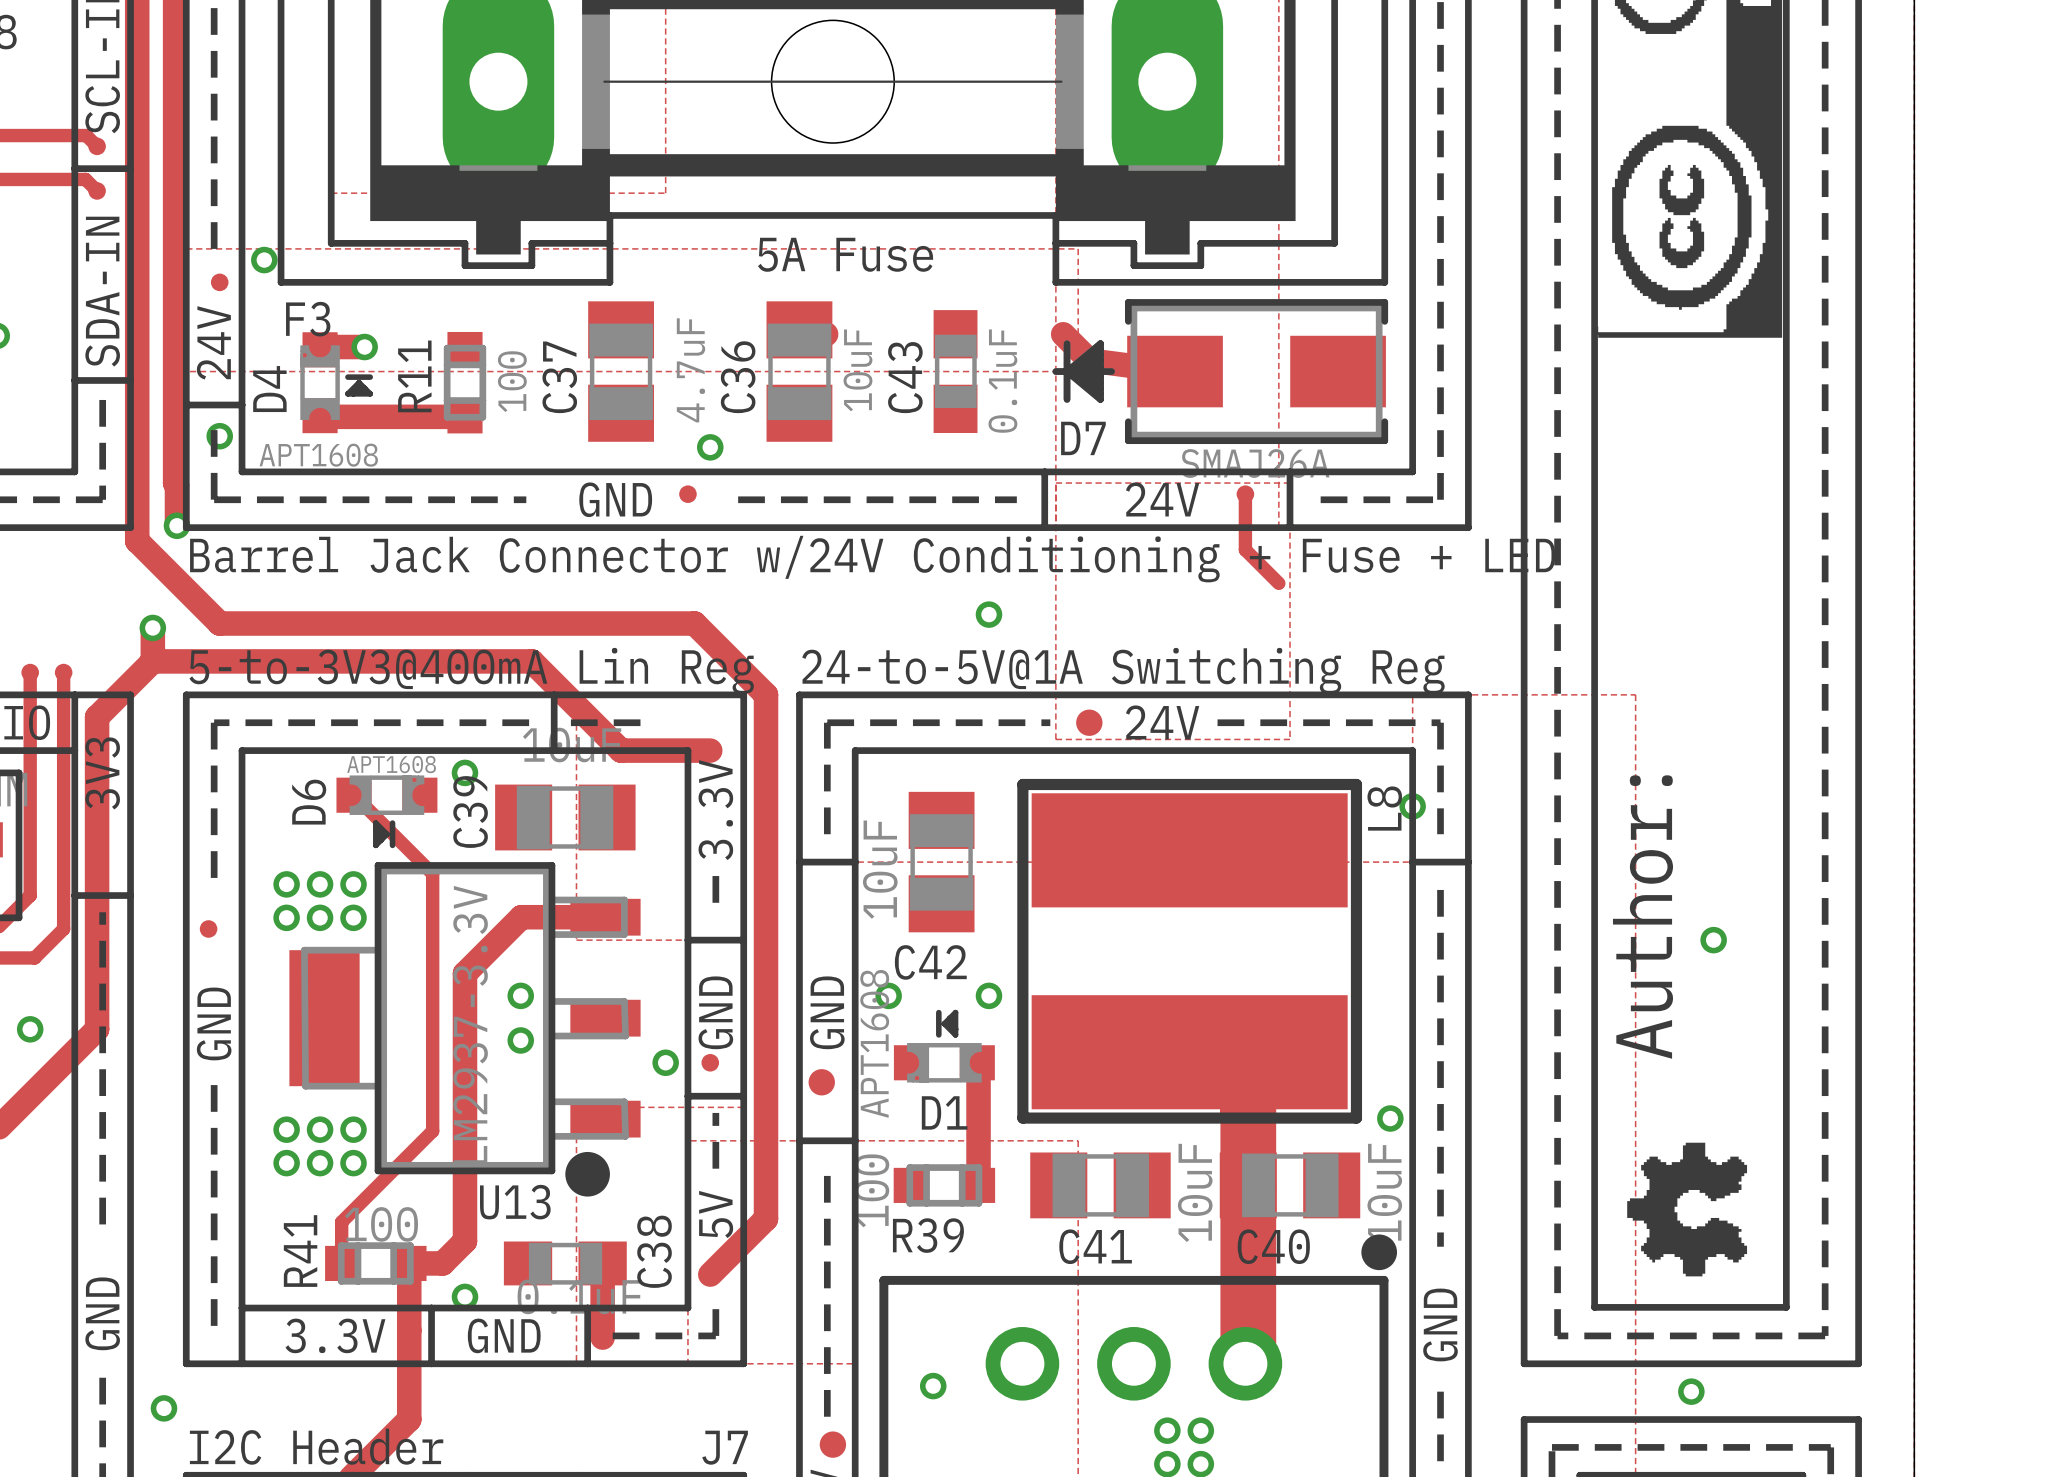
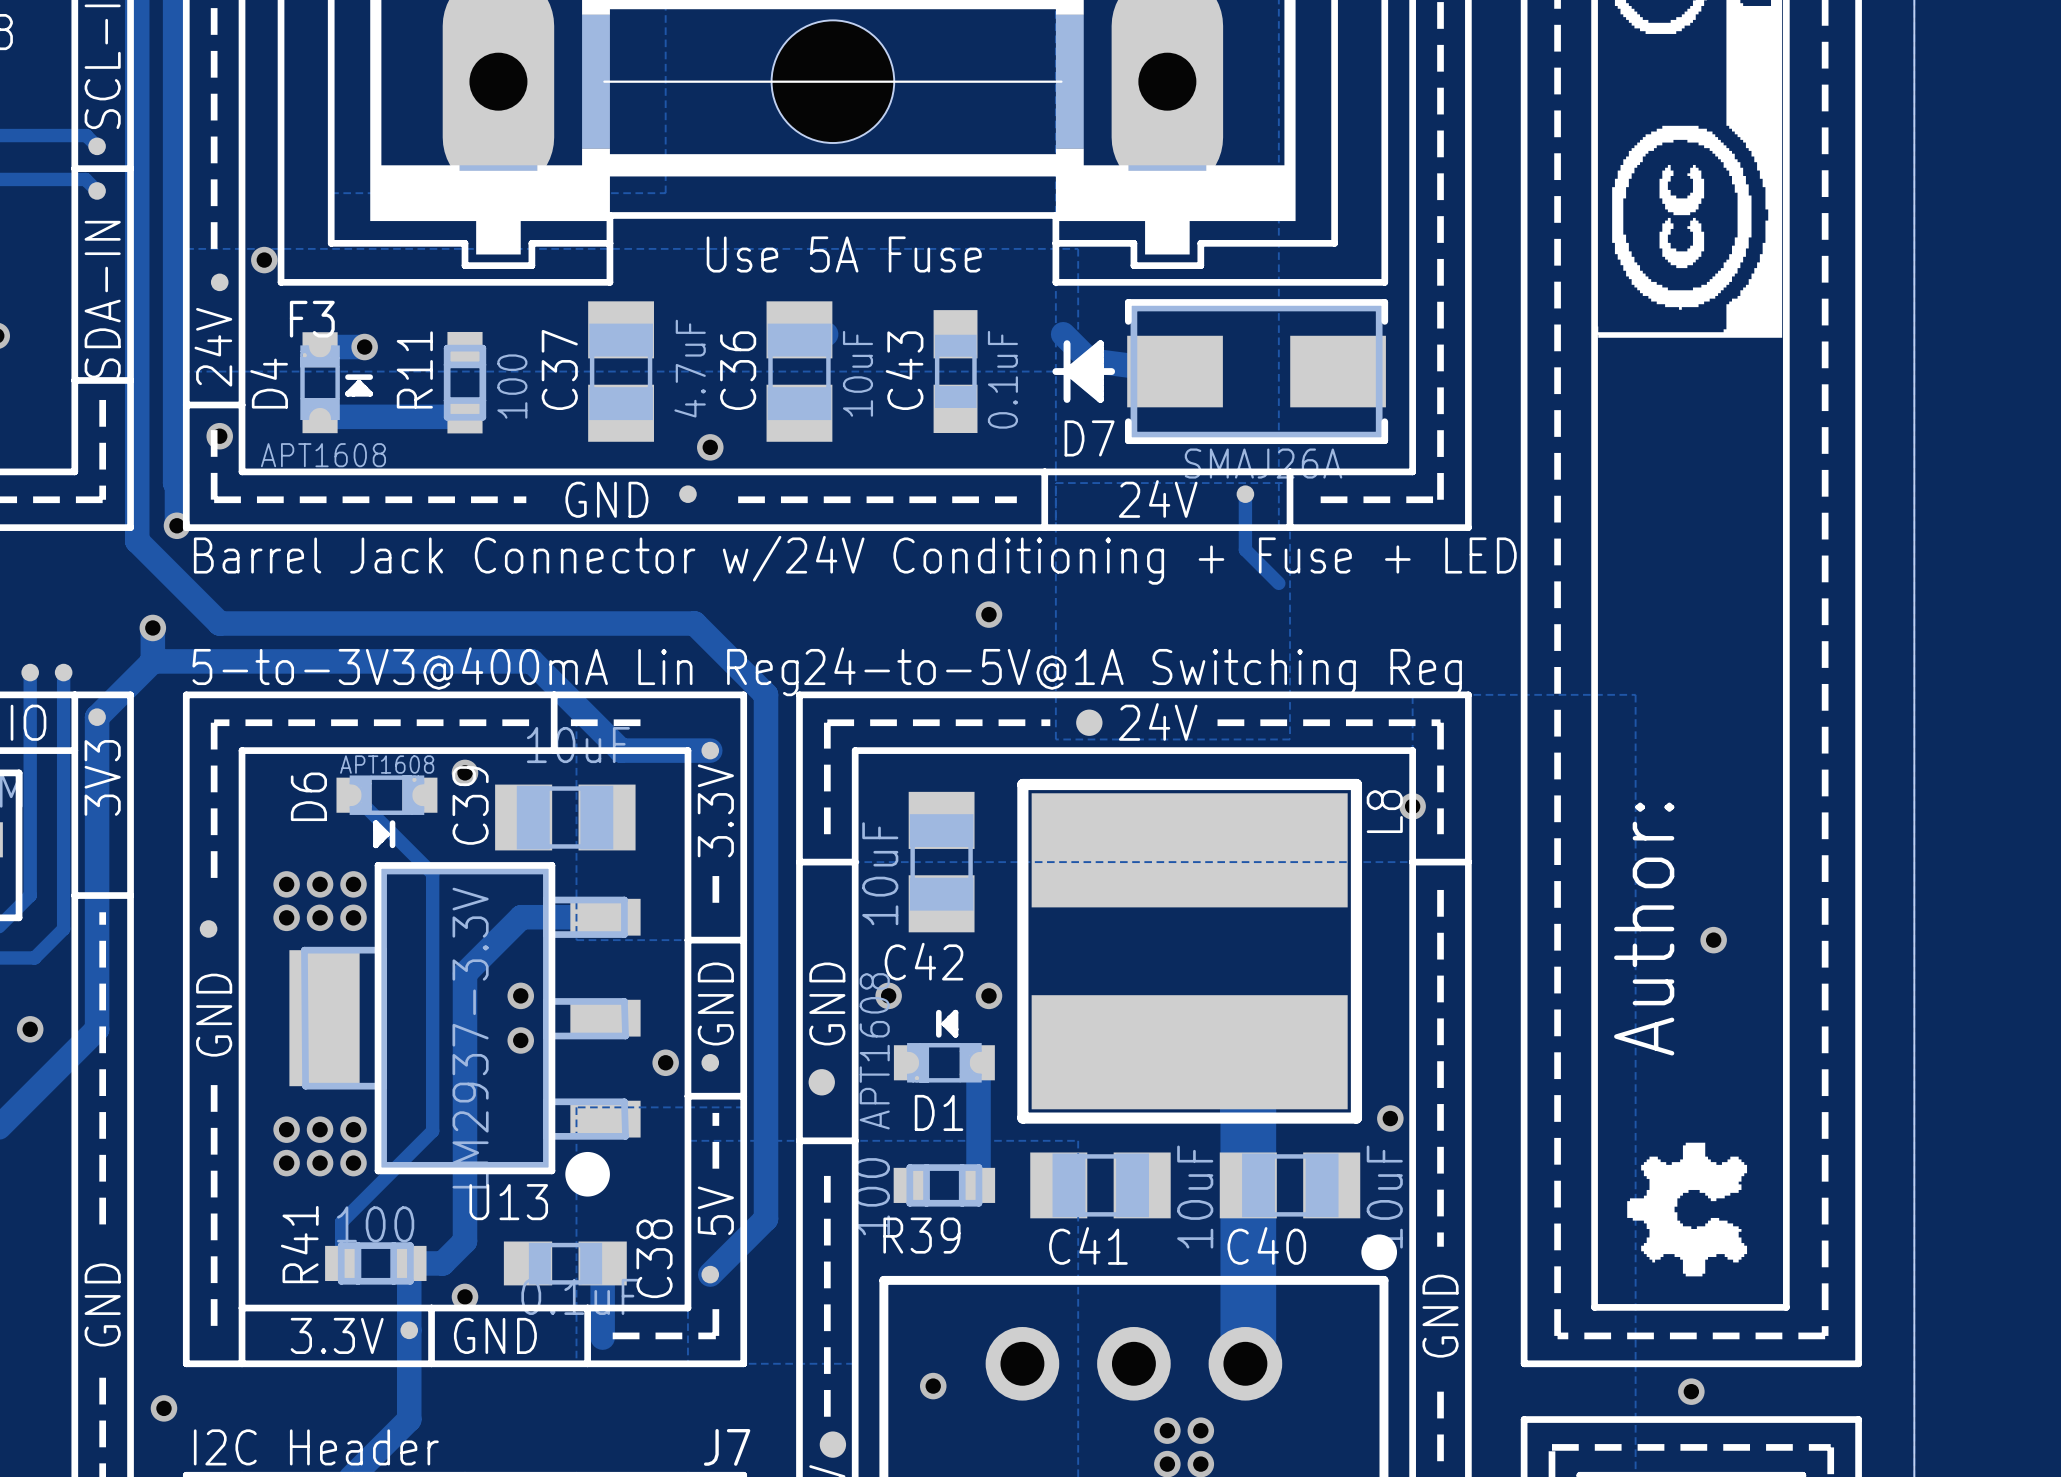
drawing: none -> [706, 236, 982, 273]
text: 5A Fuse (845, 254) -> none

